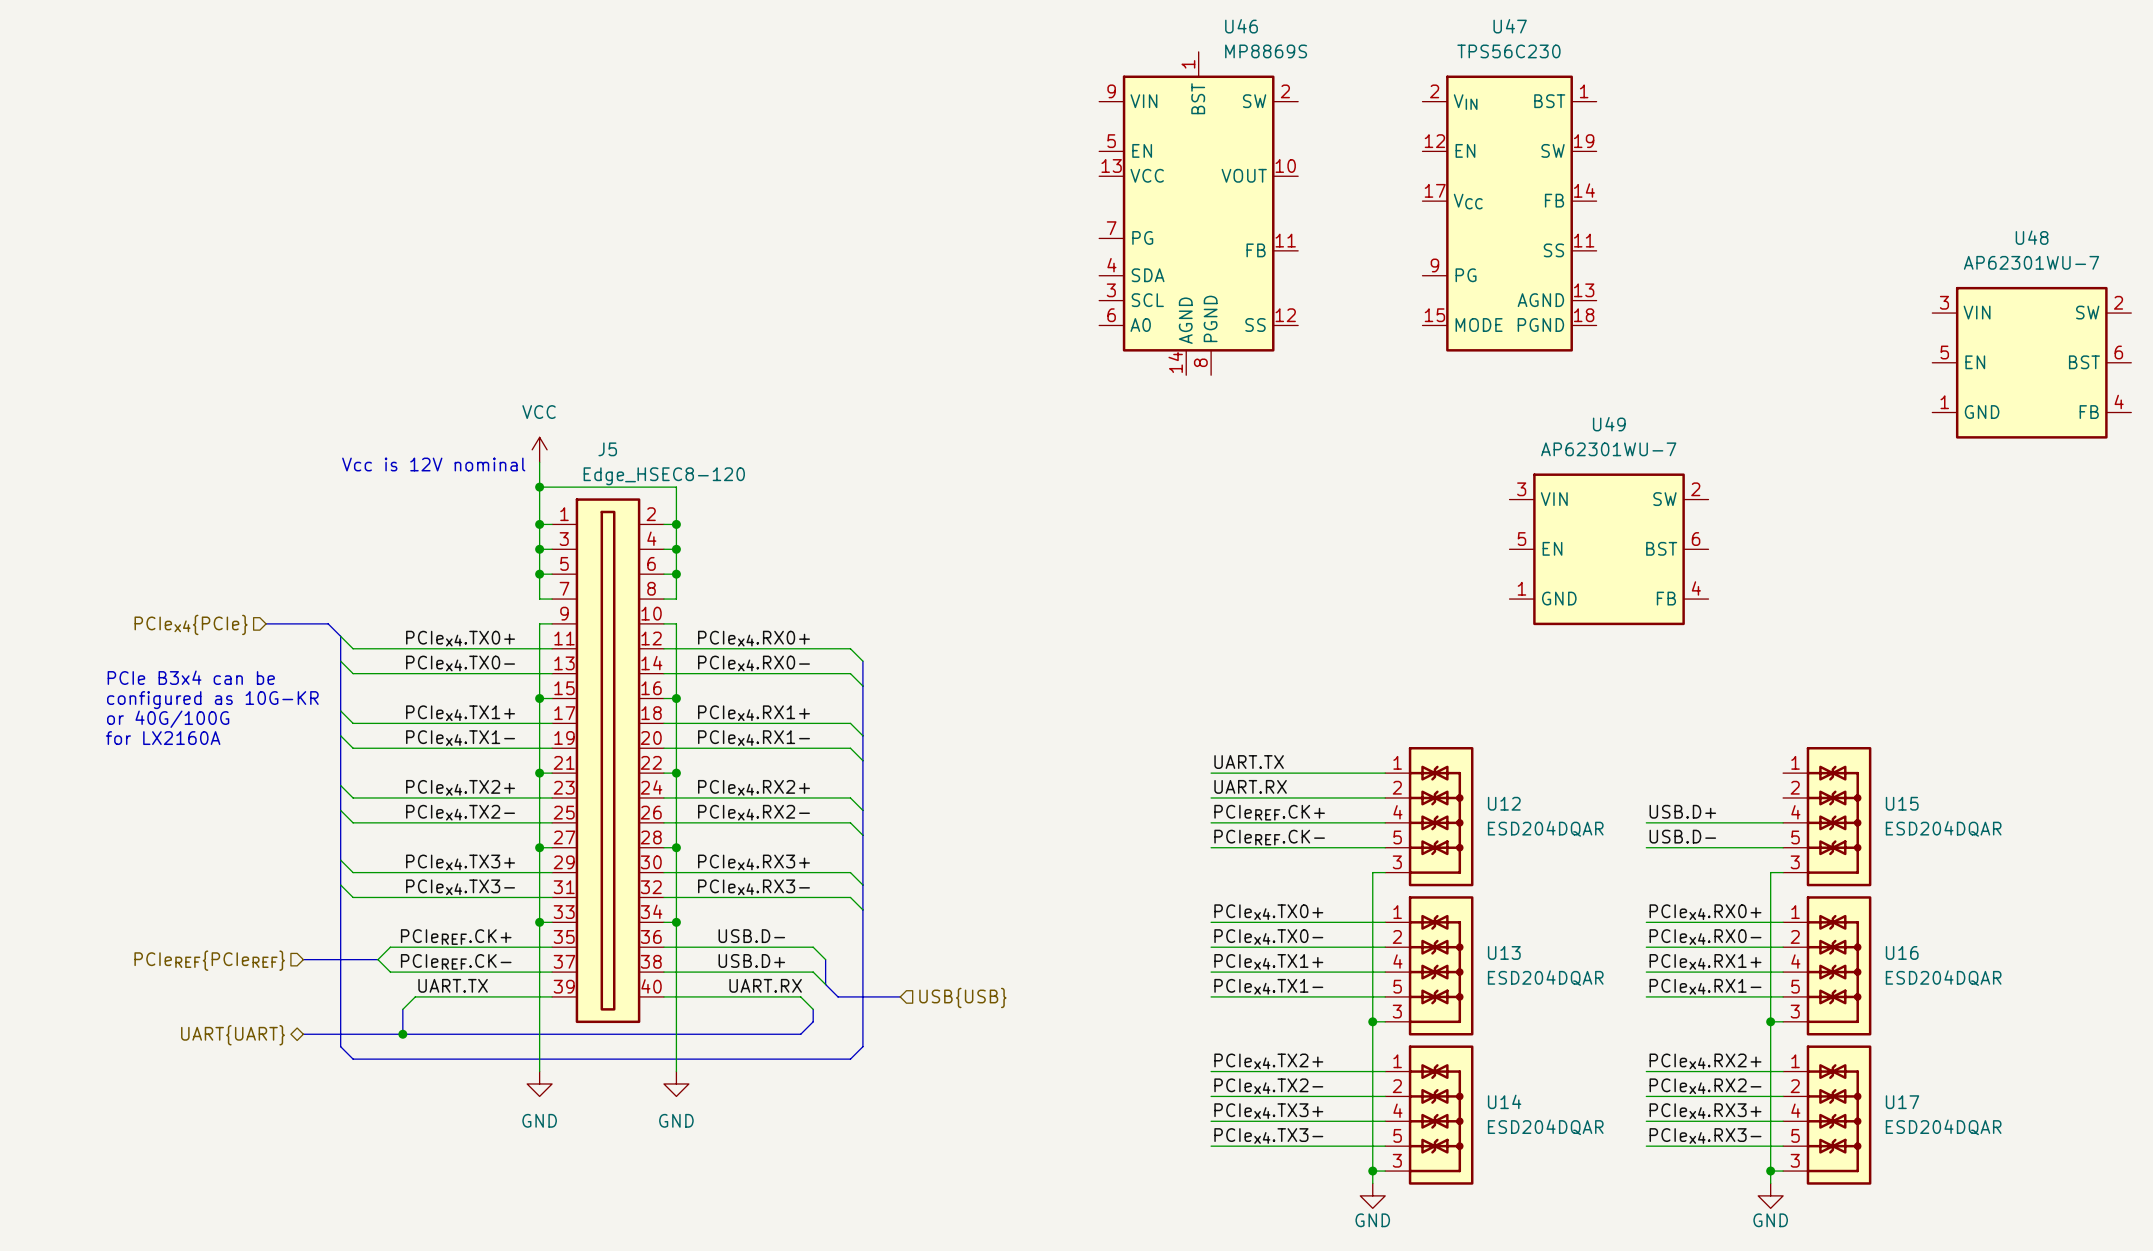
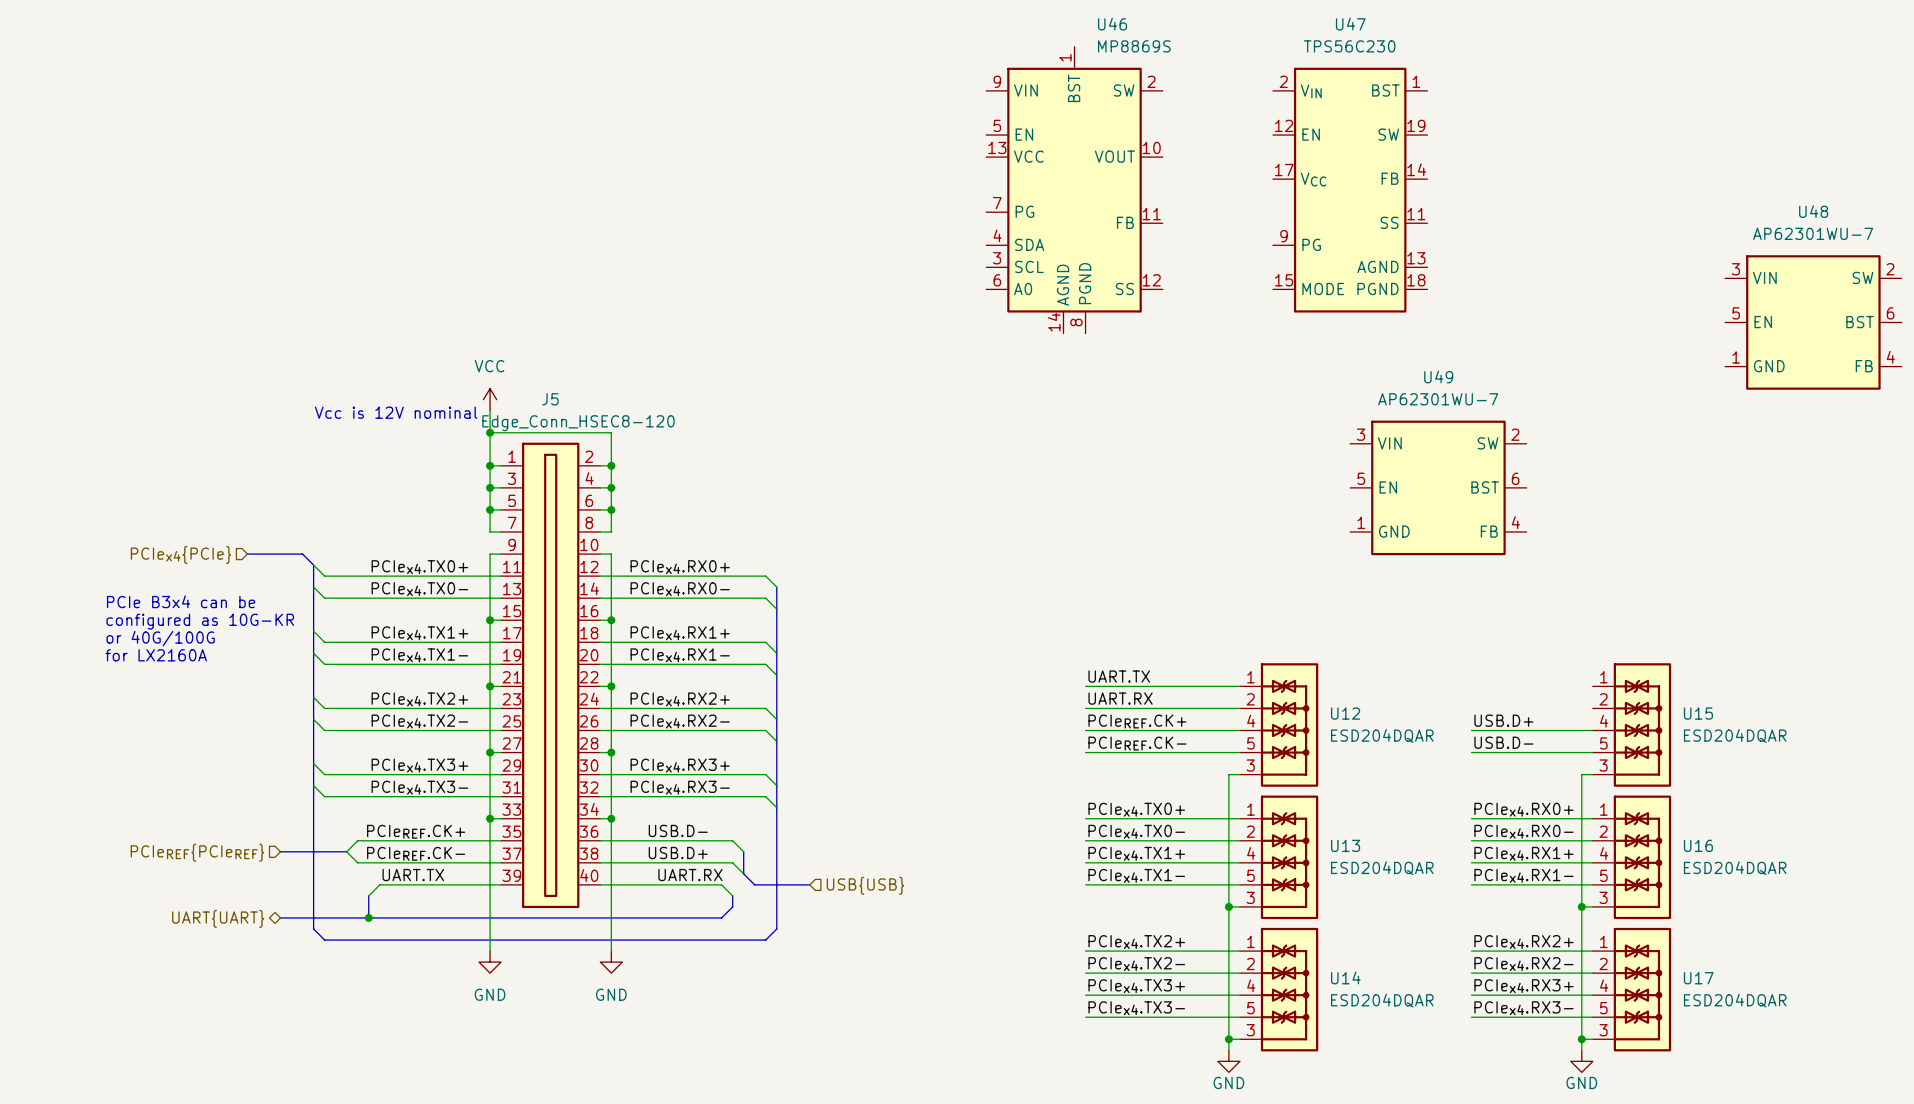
J5 value: Edge_HSEC8-120 (664, 476) -> Edge_Conn_HSEC8-120 (578, 423)
J5 symbol: [552, 498, 664, 1024] -> [501, 442, 601, 909]

